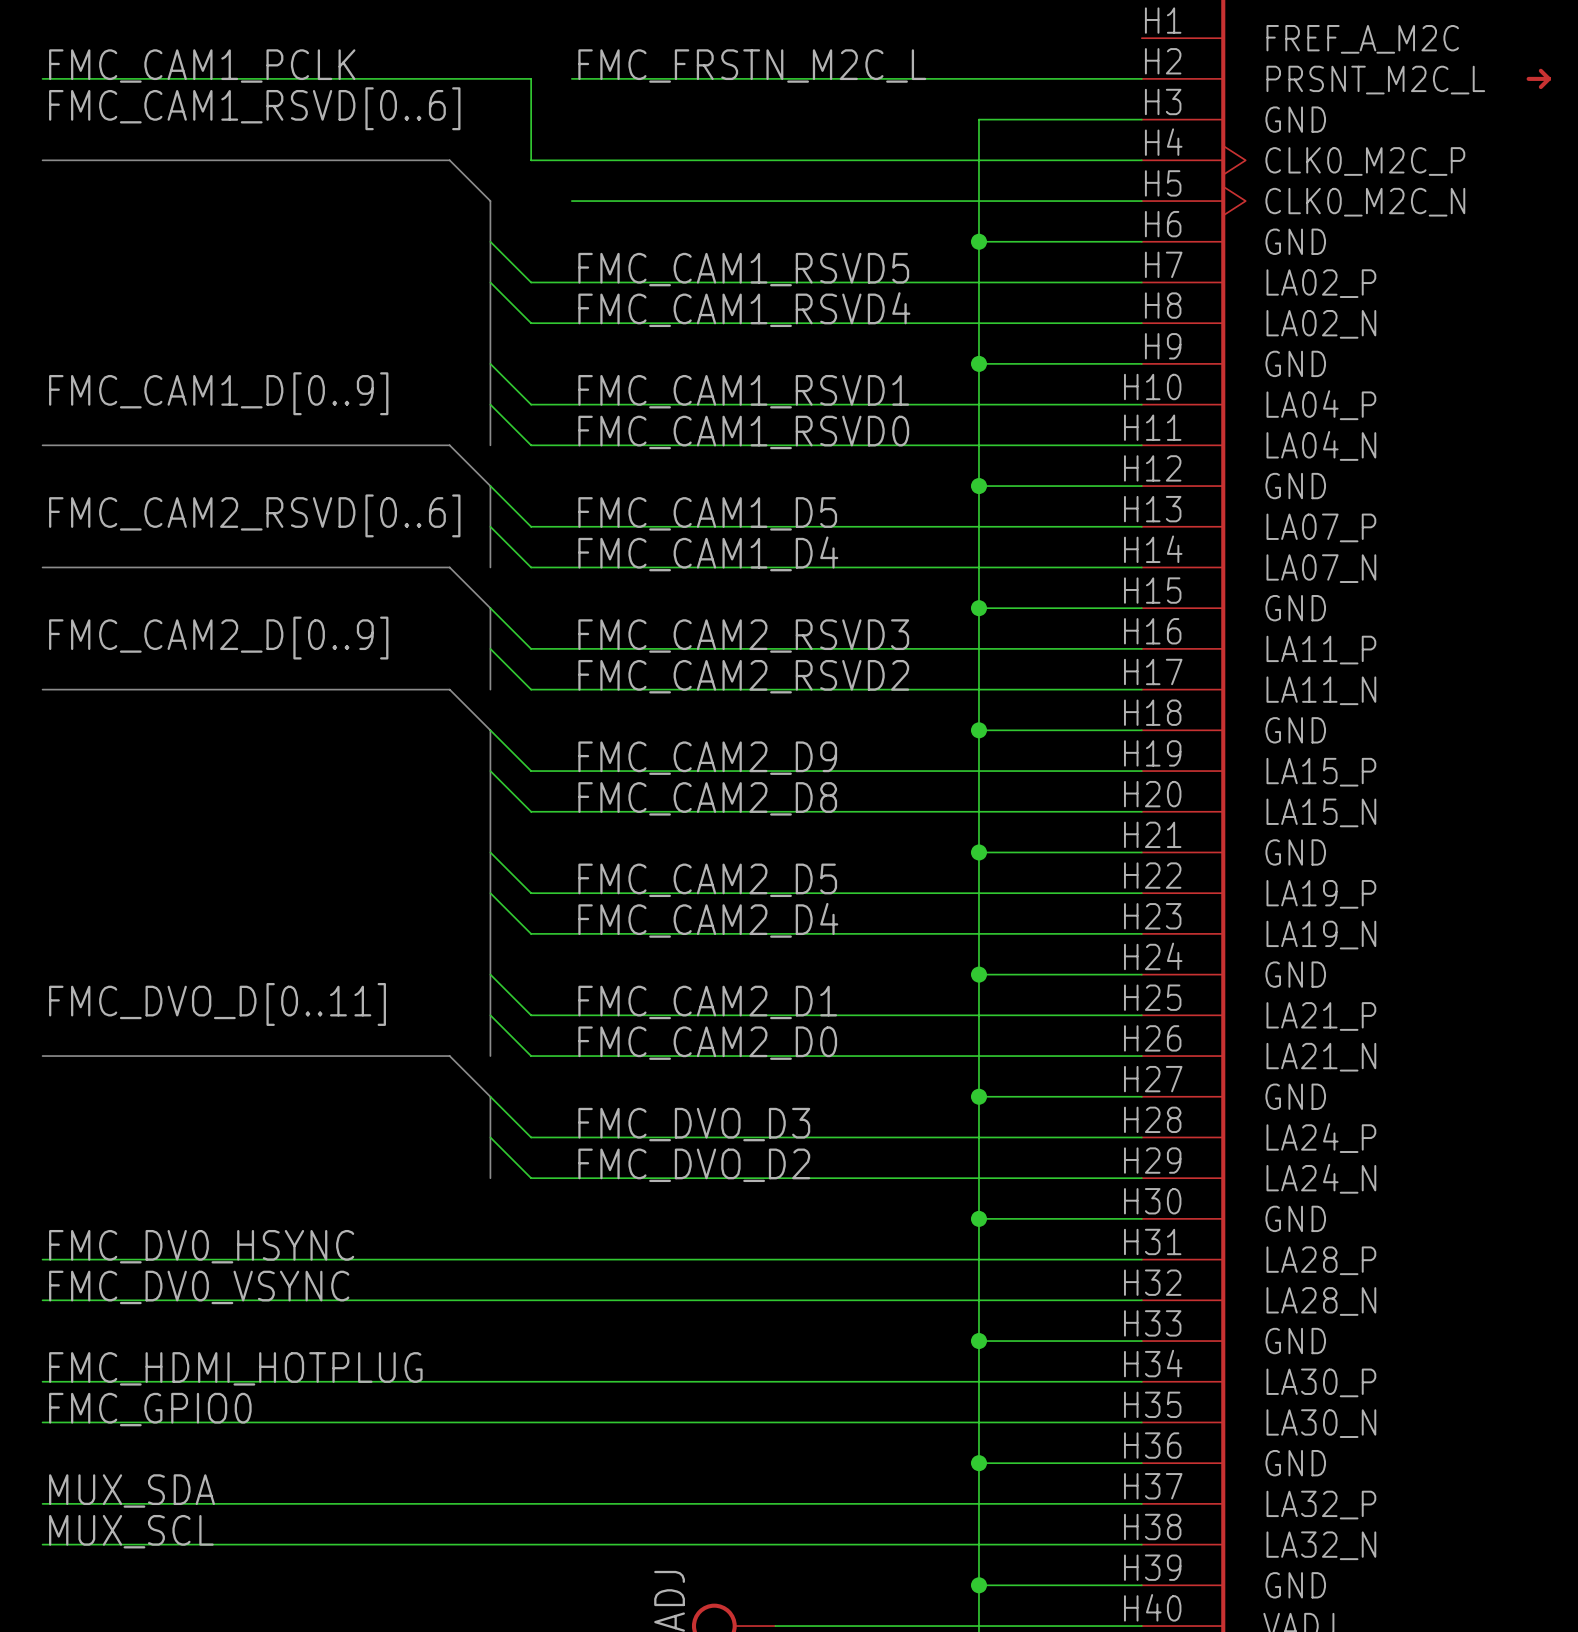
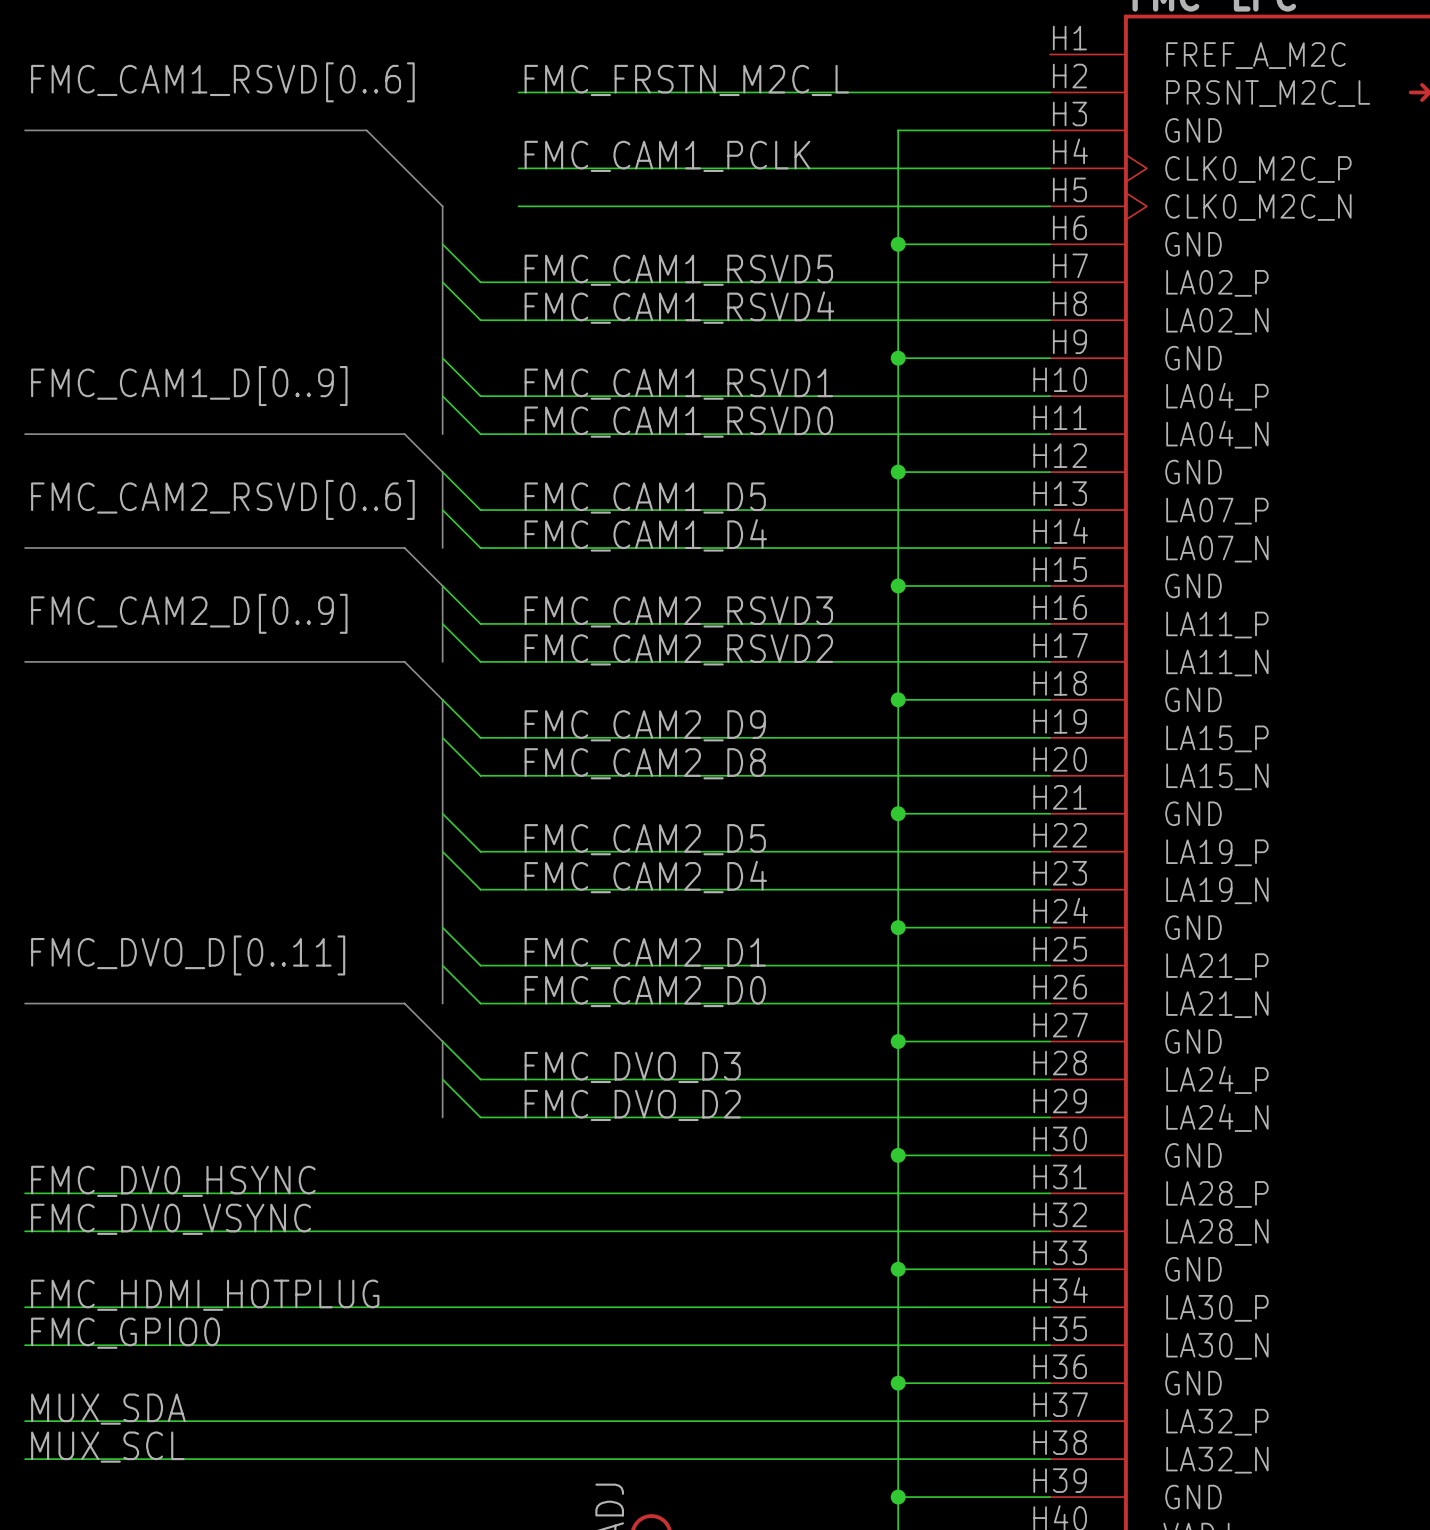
label: FMC_CAM1_PCLK (202, 66) -> FMC_CAM1_RSVD[0..6] (222, 82)
wire: (42, 78) (531, 78) (531, 160) (571, 160) -> none
label: FMC_CAM1_RSVD[0..6] (254, 108) -> none
label: none -> FMC_CAM1_PCLK (667, 156)
bus: (42, 160) (449, 160) -> (25, 130) (366, 130) (404, 168)

